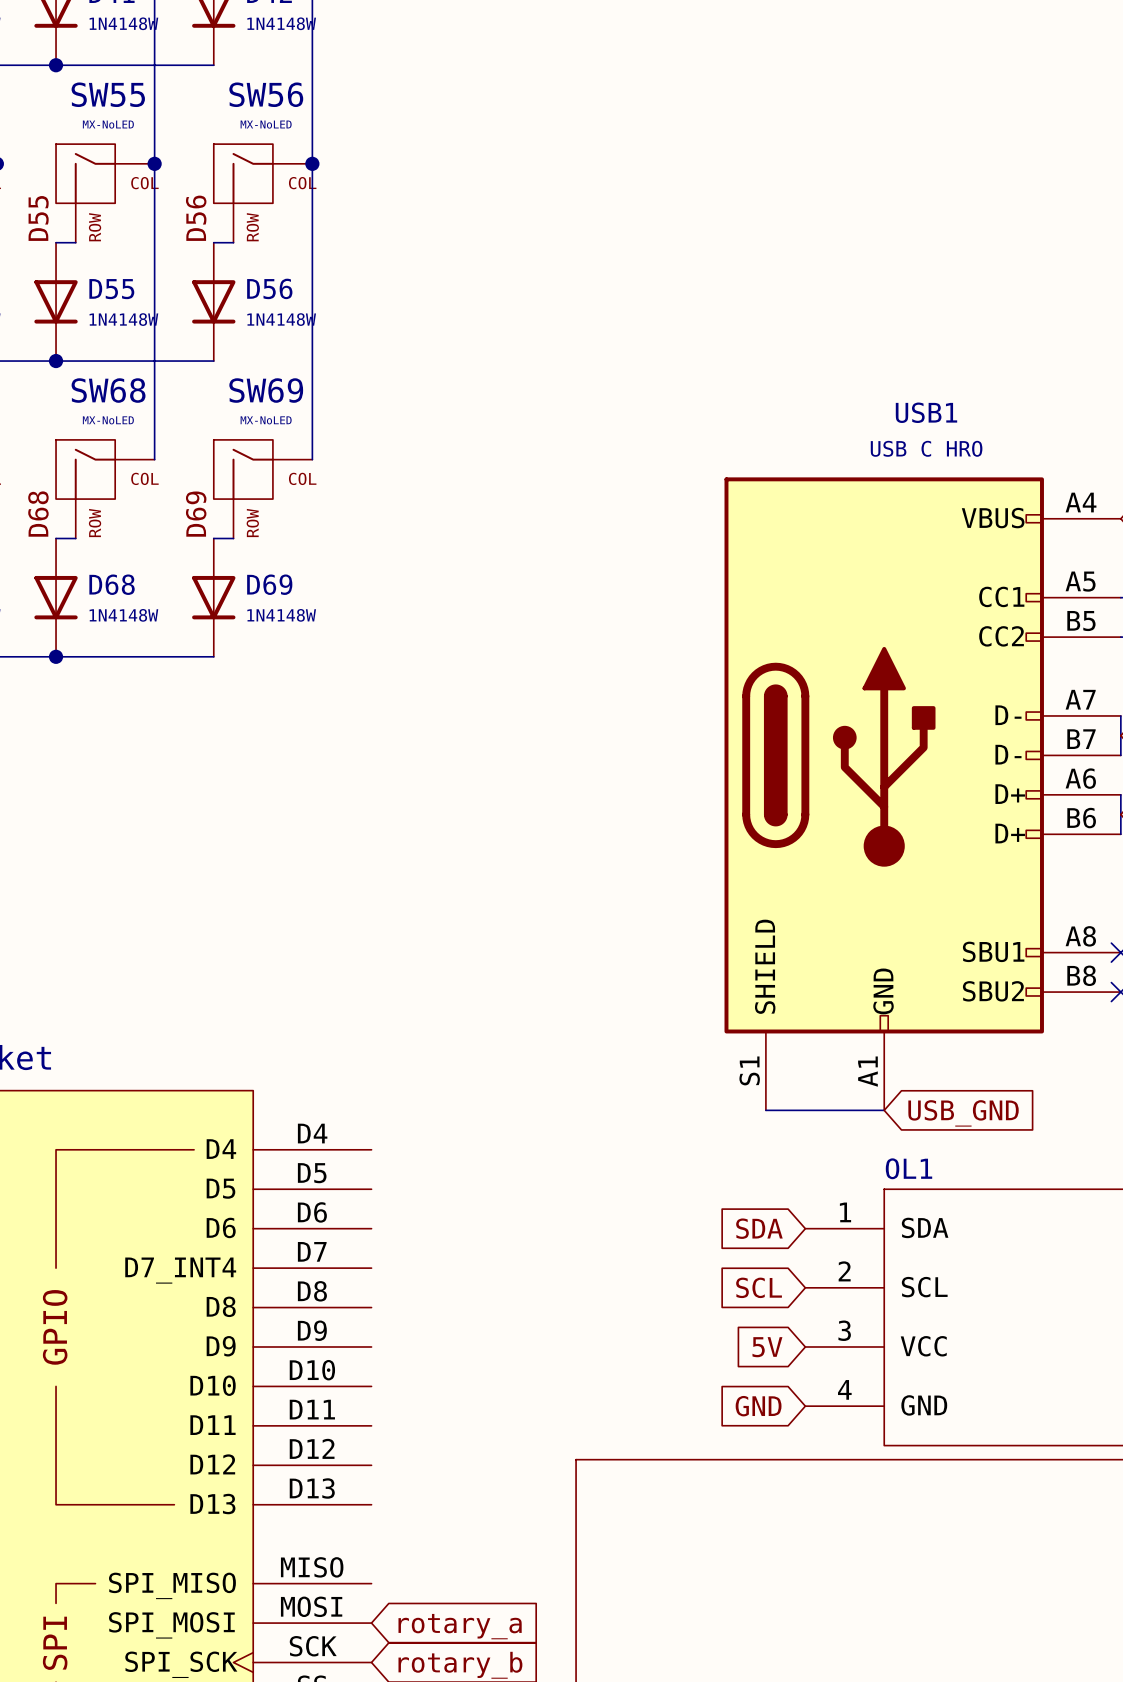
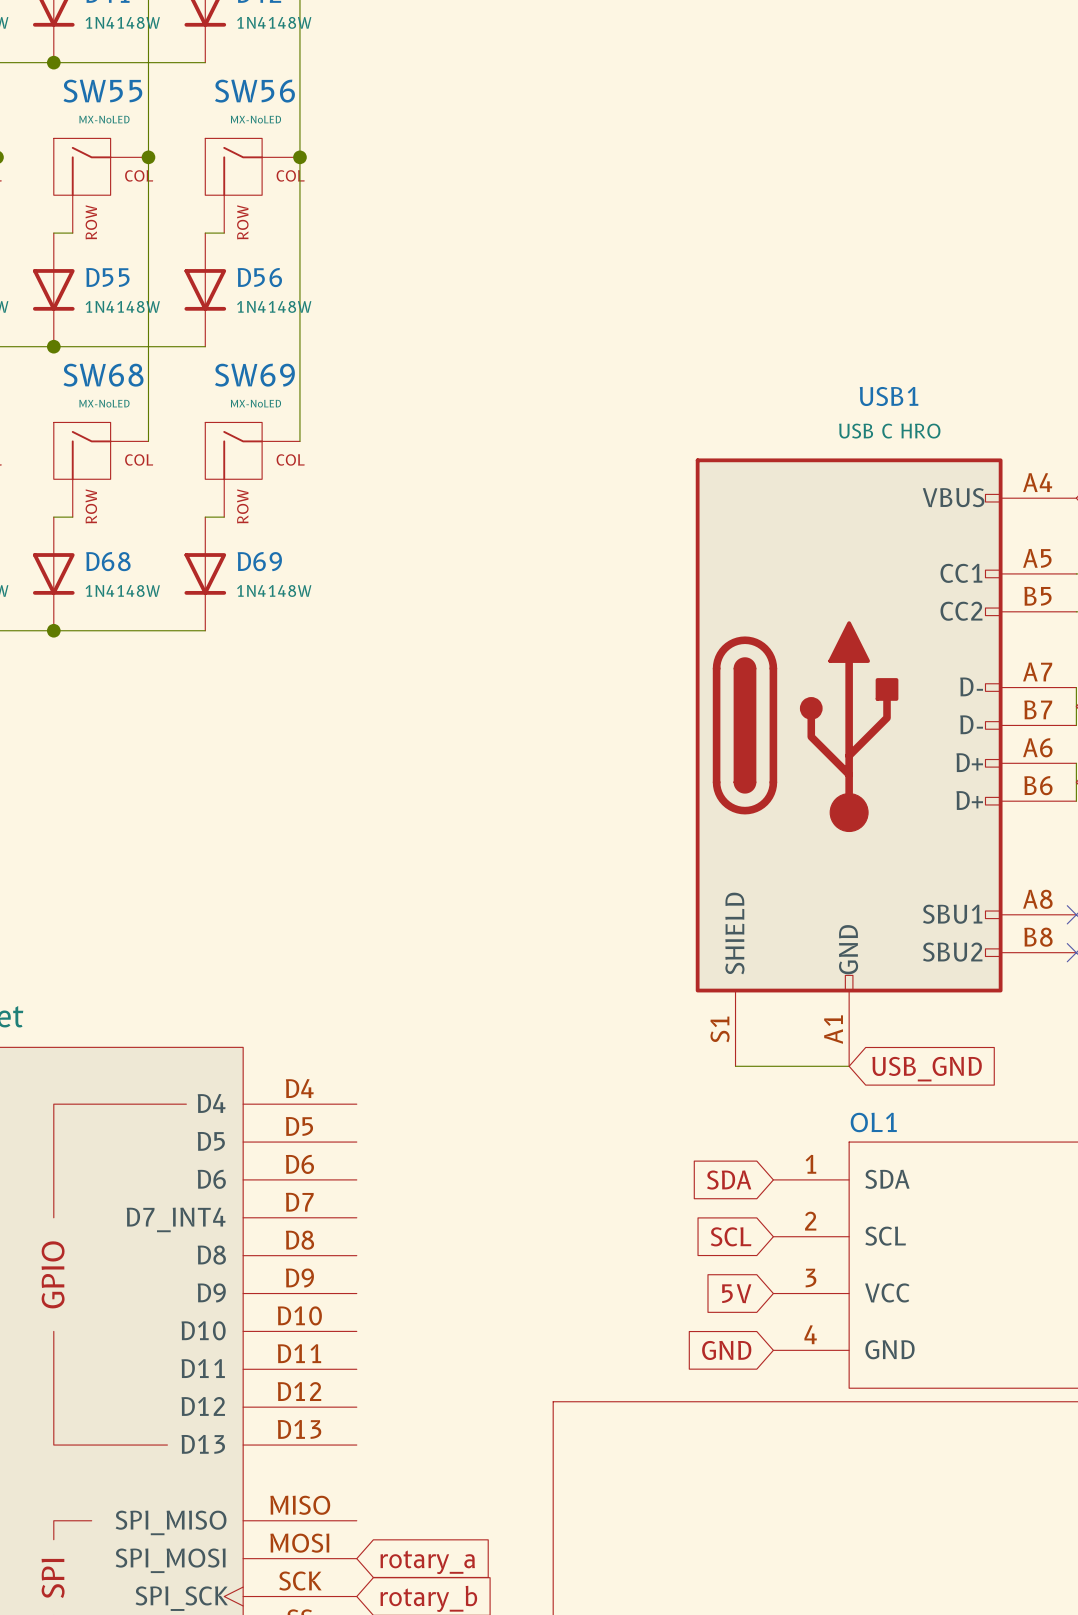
label: D55 (38, 218) -> none
label: D56 (196, 218) -> none
label: D68 (38, 514) -> none
label: D69 (196, 514) -> none

